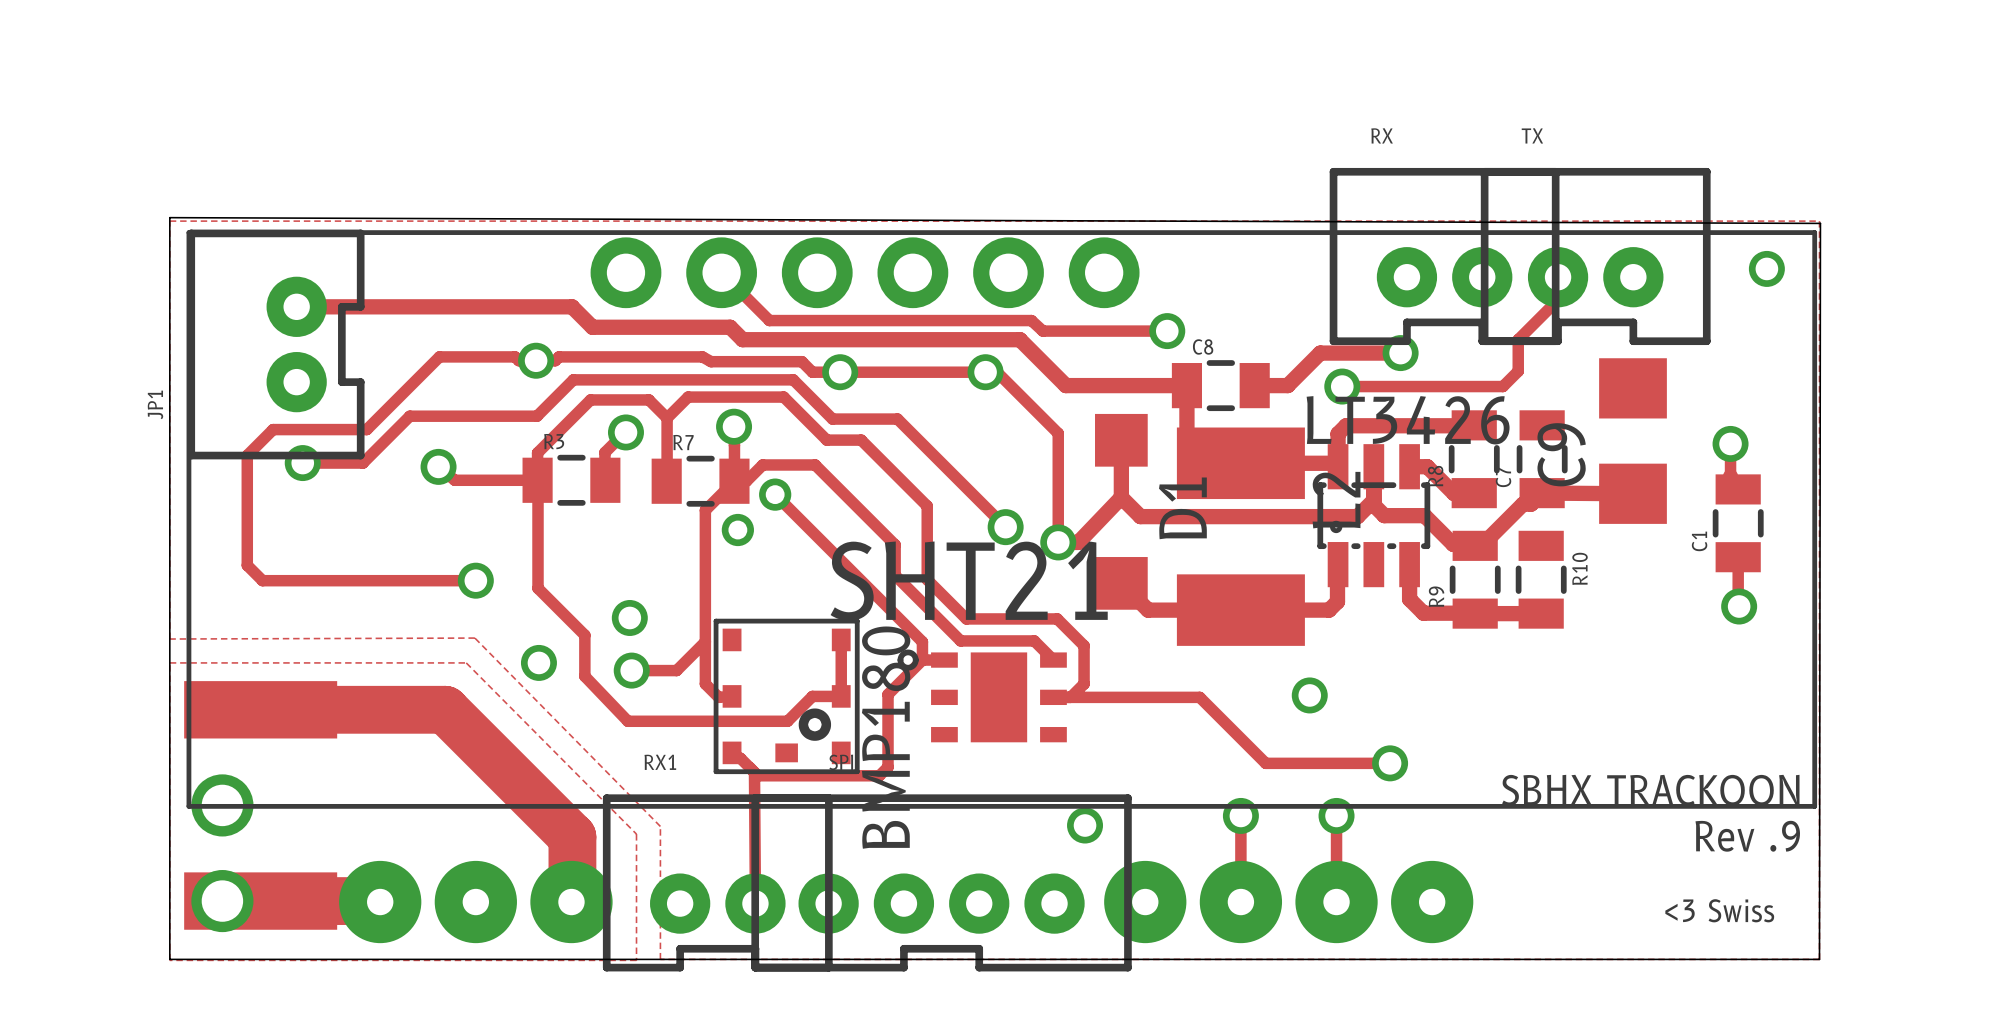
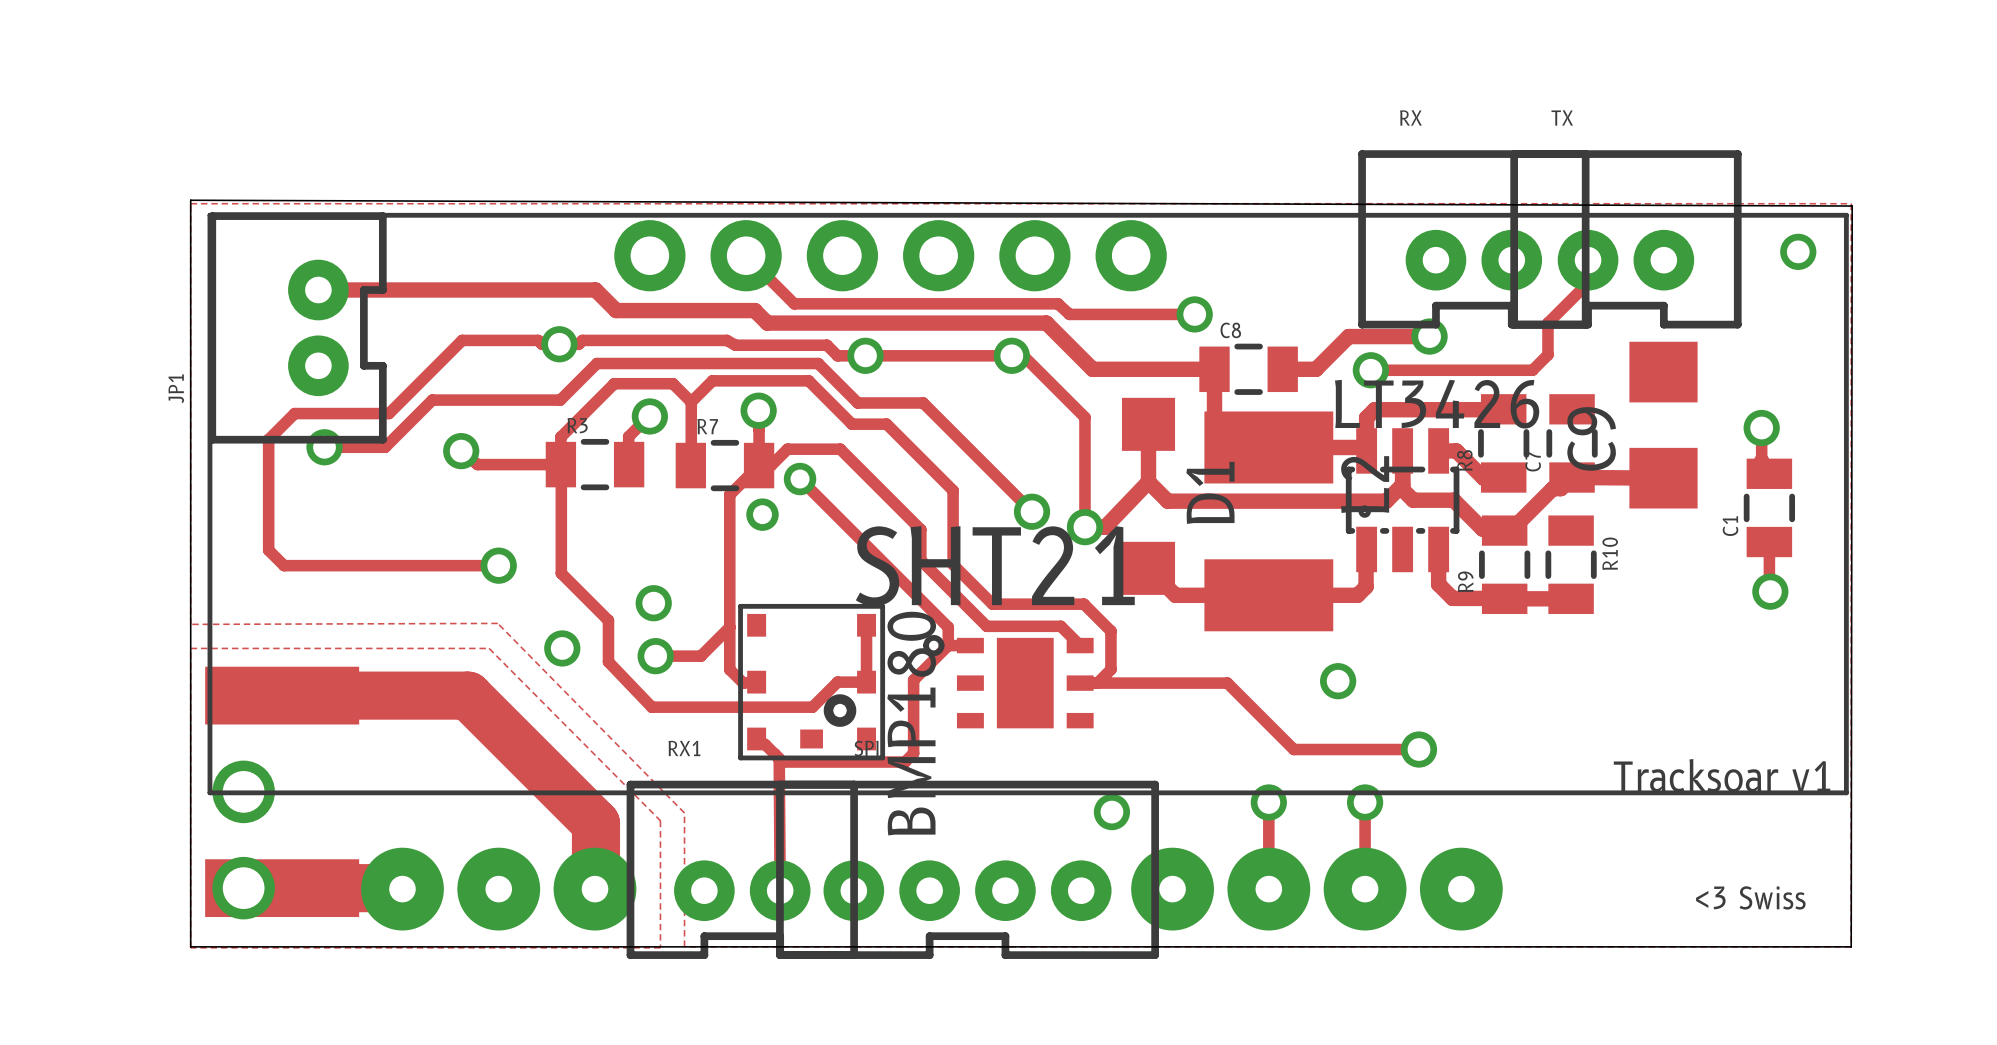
text: SBHX TRACKOON (1650, 790) -> Tracksoar v1 (1722, 775)
text: Rev .9 (1747, 836) -> none

